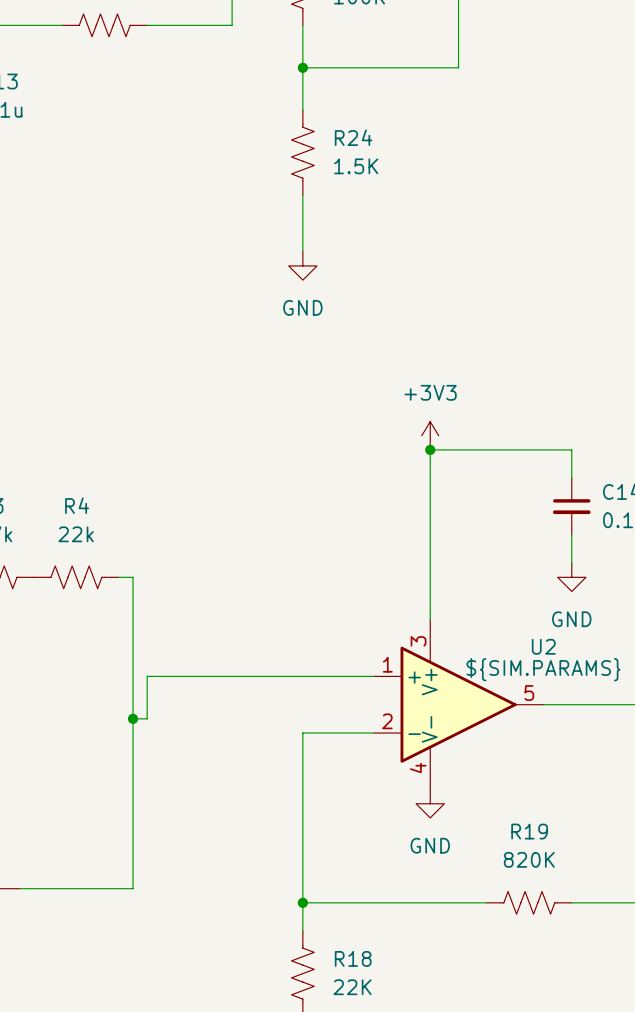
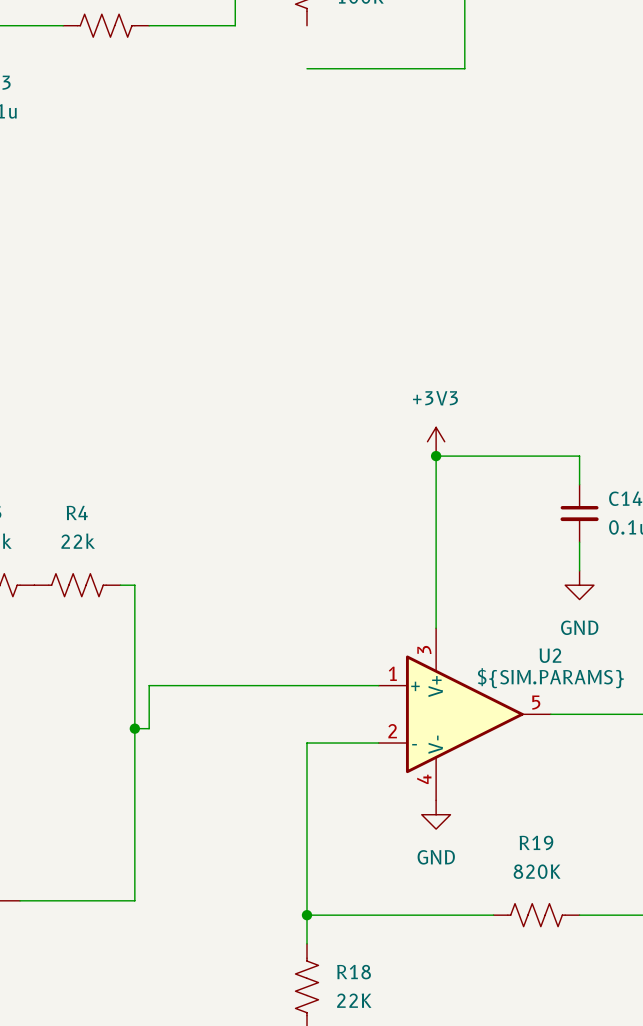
wire: (302, 25) (302, 110) -> none
junction: (302, 67) -> none
R24: 1.5K (302, 152) -> none
wire: (302, 195) (302, 251) -> none
power symbol: GND (302, 265) -> none

